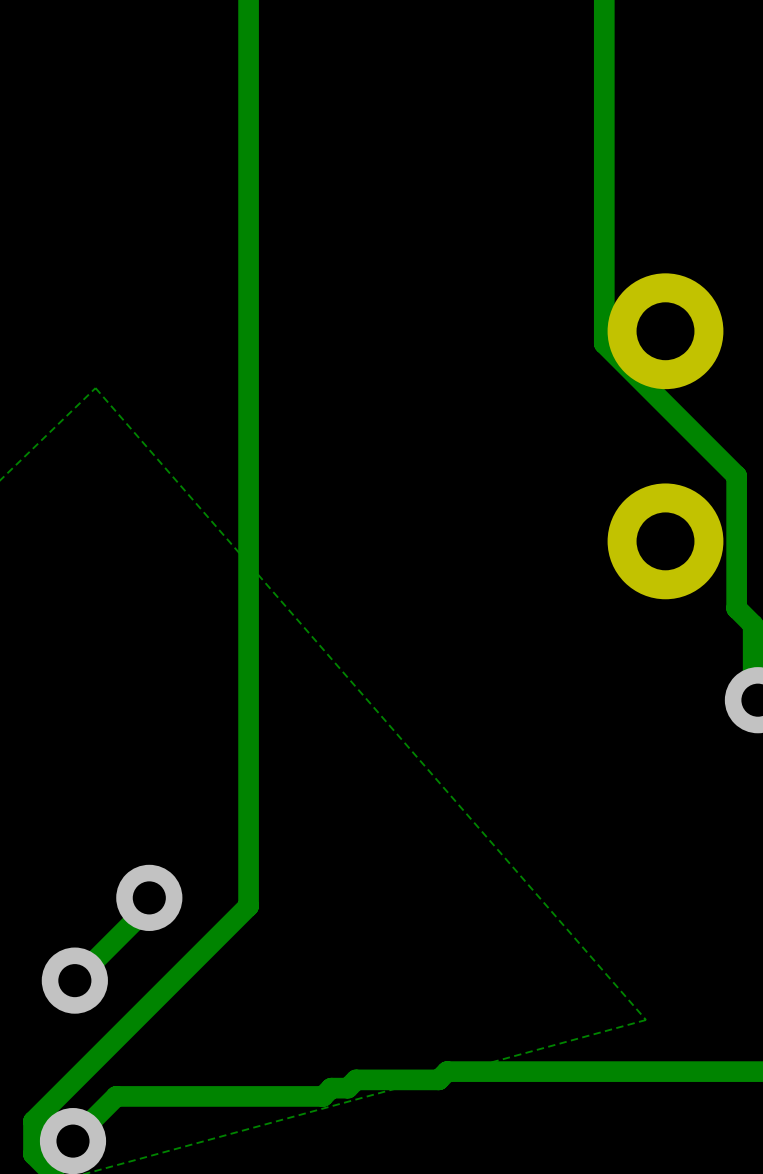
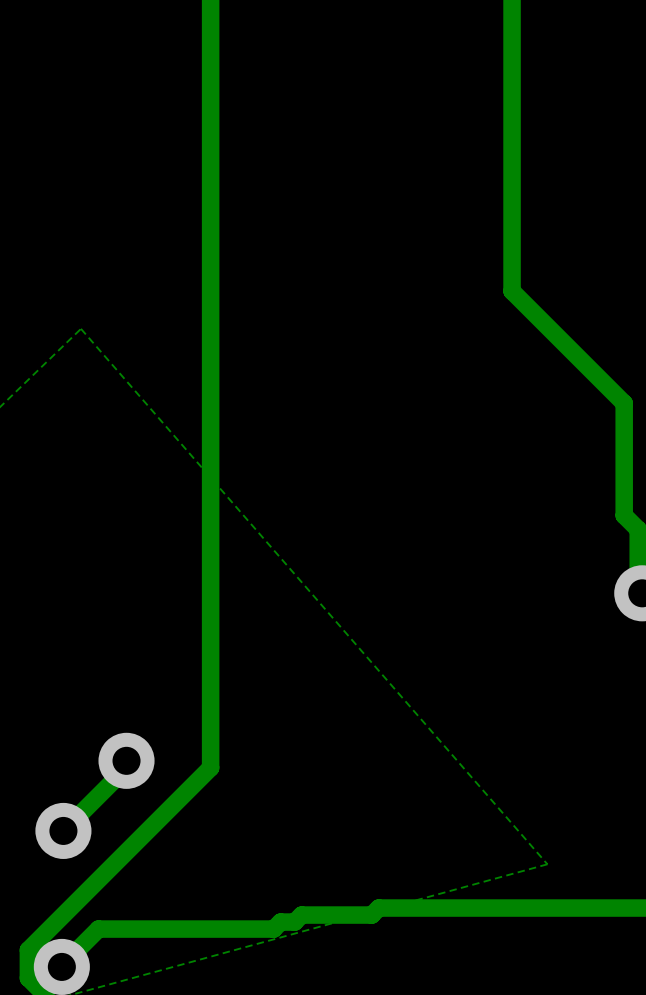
part: (665, 436) -> none

